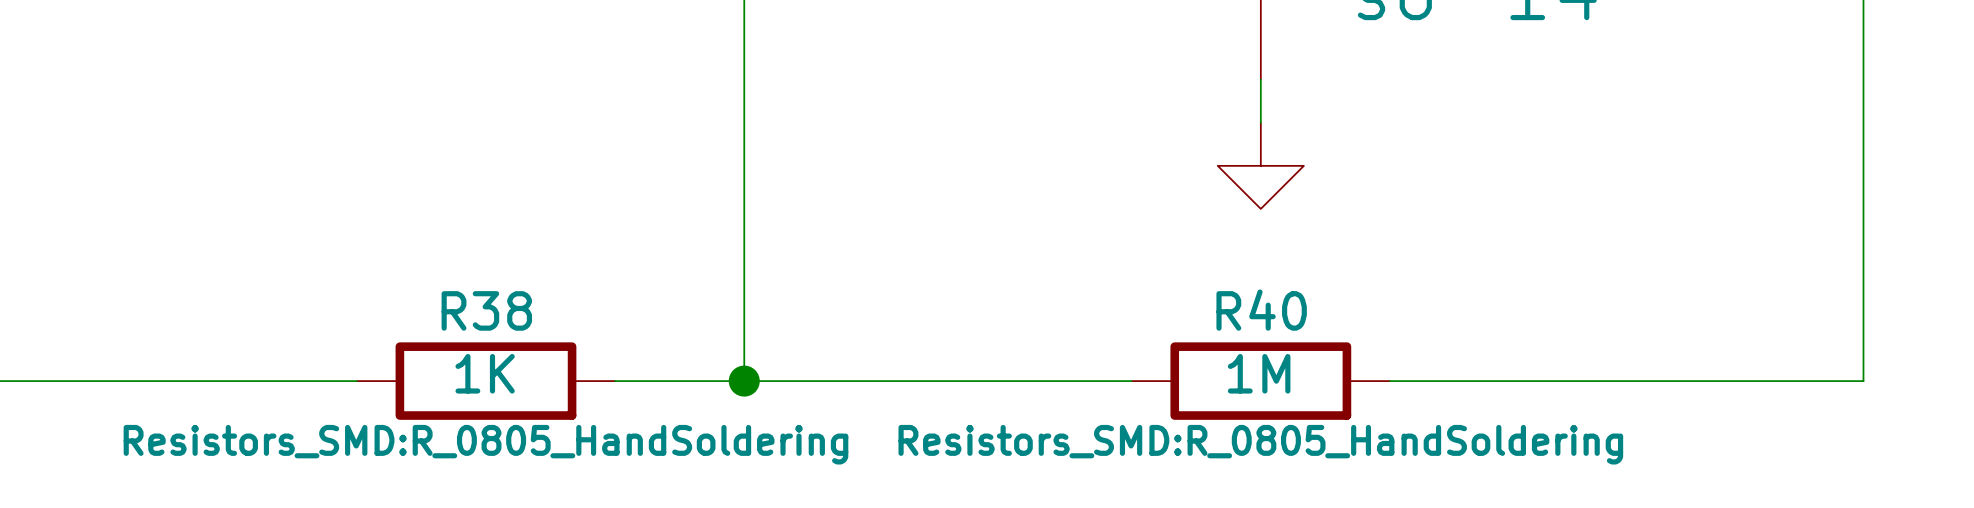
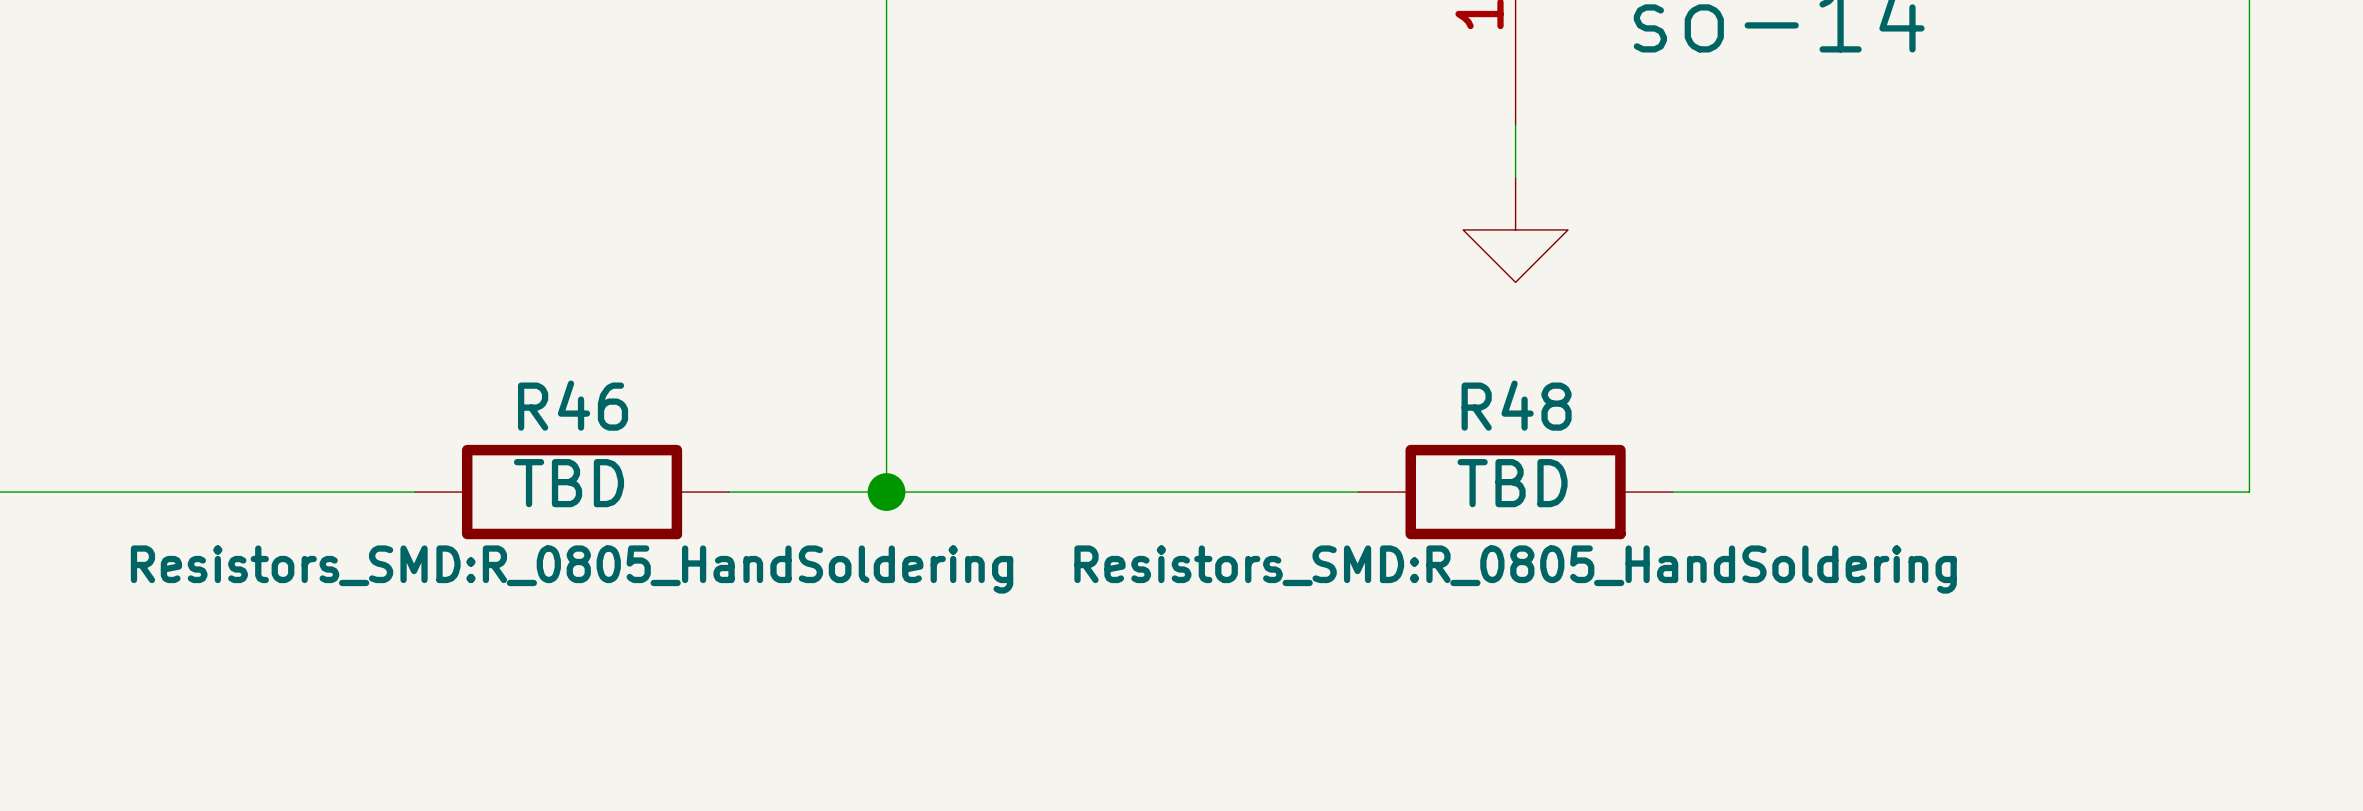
R38 name: R38 (486, 310) -> R46 (573, 405)
R40 name: R40 (1261, 310) -> R48 (1516, 405)
R38 value: 1K (485, 373) -> TBD (568, 483)
R40 value: 1M (1259, 373) -> TBD (1512, 483)

